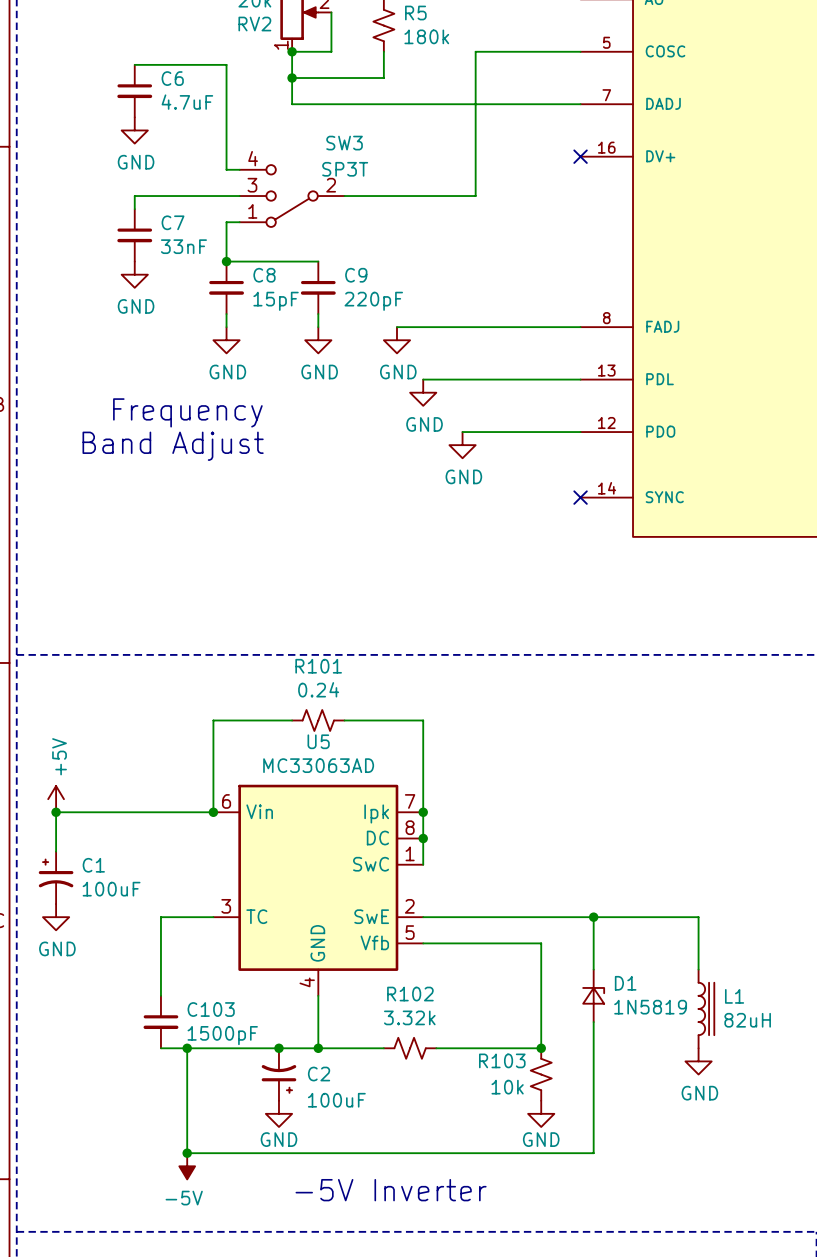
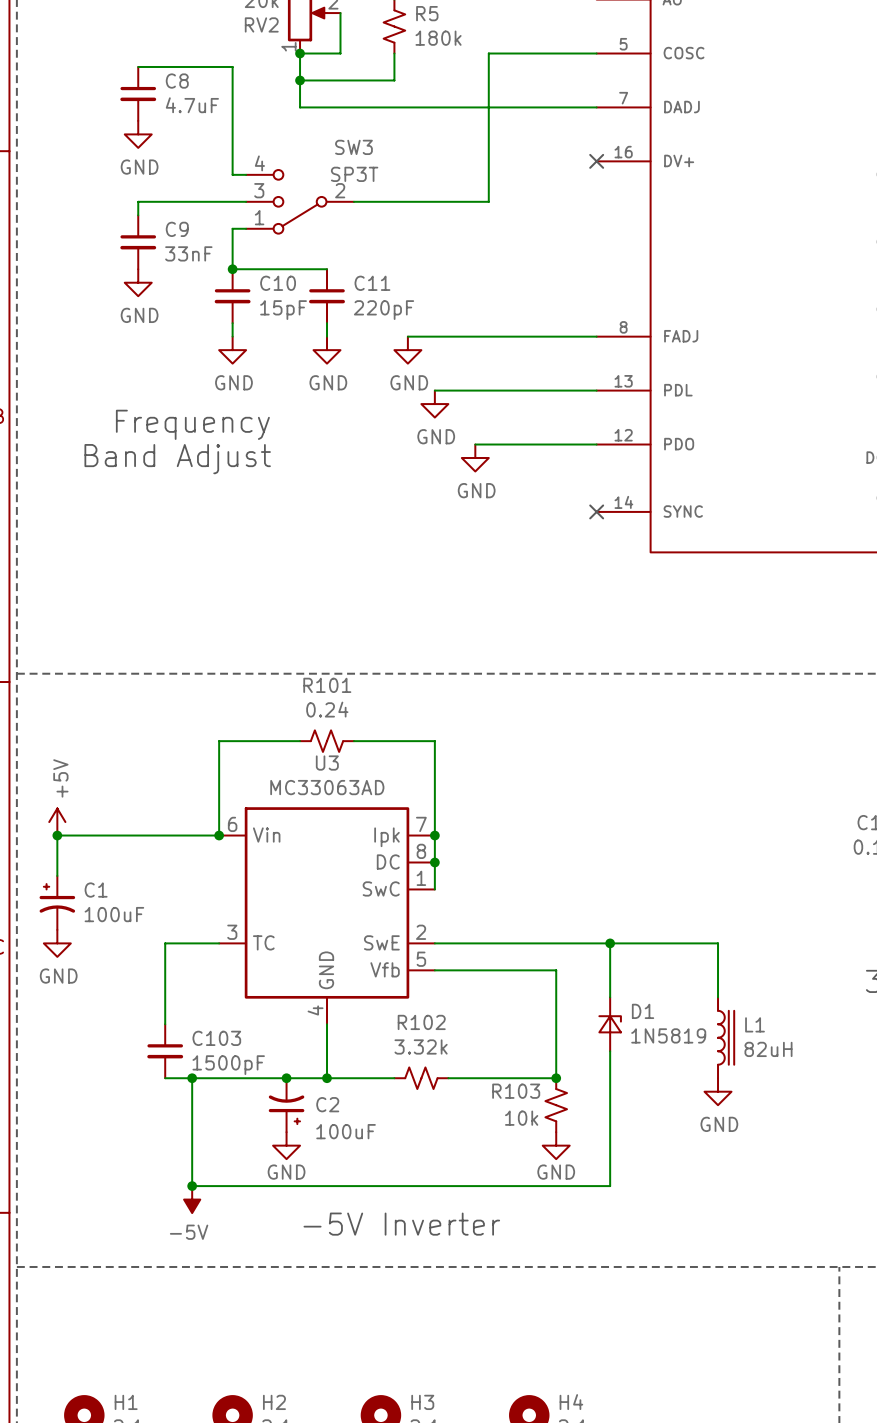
C6 name: C6 (172, 78) -> C8 (177, 81)
C7 name: C7 (173, 222) -> C9 (177, 229)
C8 name: C8 (264, 275) -> C10 (278, 283)
C9 name: C9 (356, 275) -> C11 (372, 283)
U5 name: U5 (318, 741) -> U3 (327, 763)

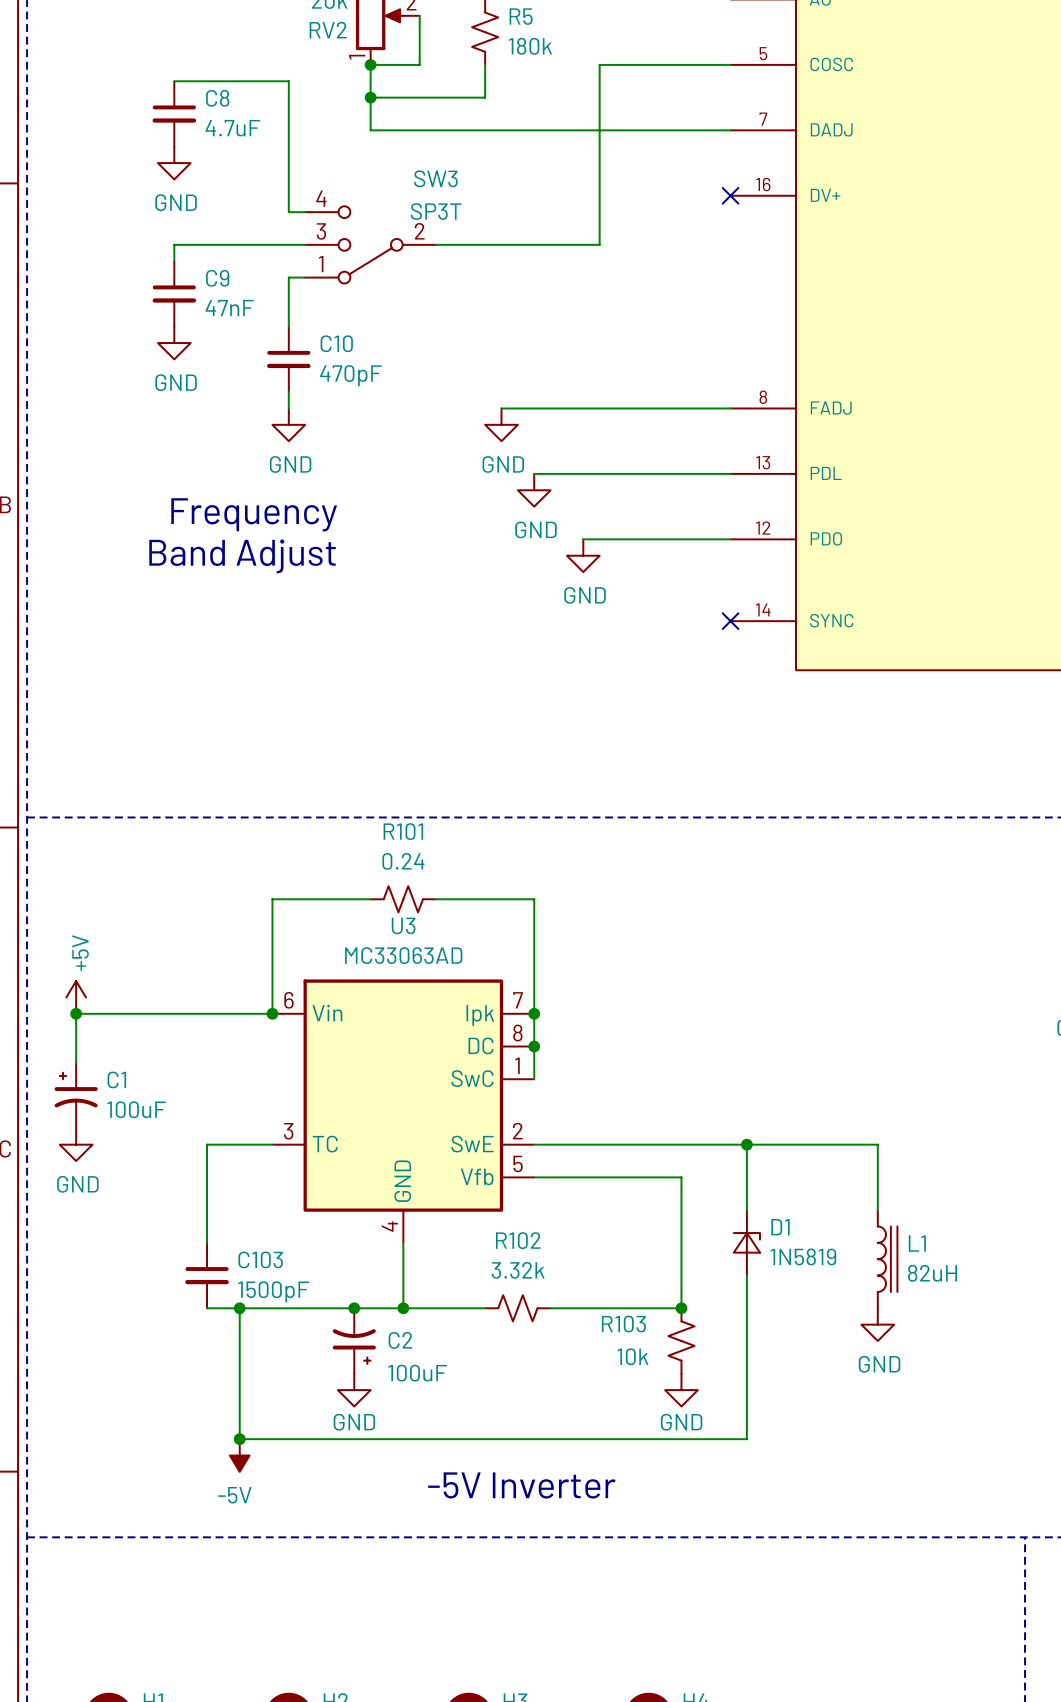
C9 value: 33nF (188, 253) -> 47nF (229, 308)
wire: (232, 269) (327, 269) -> none
junction: (232, 269) -> none
C11: 220pF (327, 296) -> none
C10 value: 15pF (283, 310) -> 470pF (350, 375)
wire: (327, 323) (327, 336) -> none
power symbol: GND (327, 350) -> none

